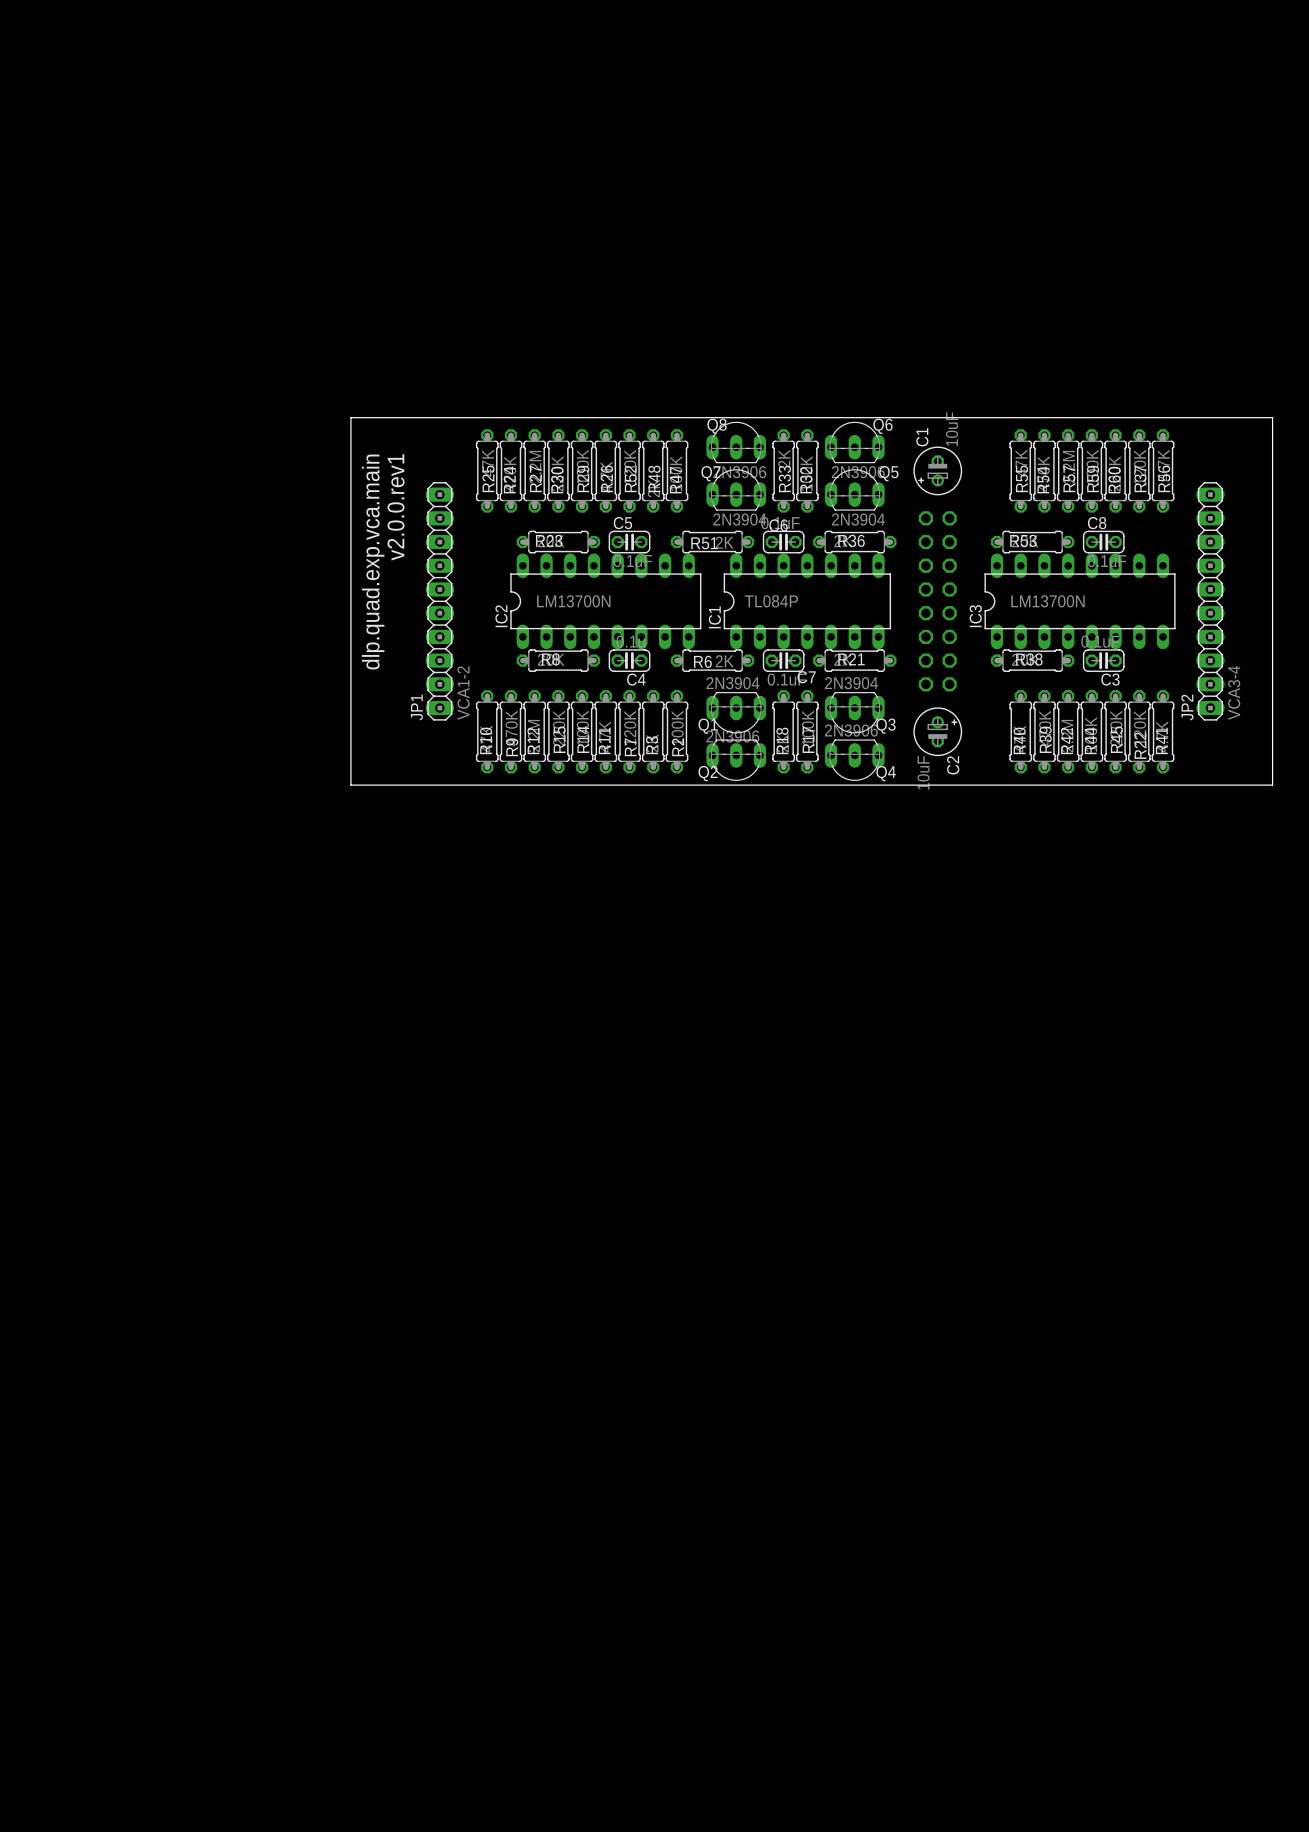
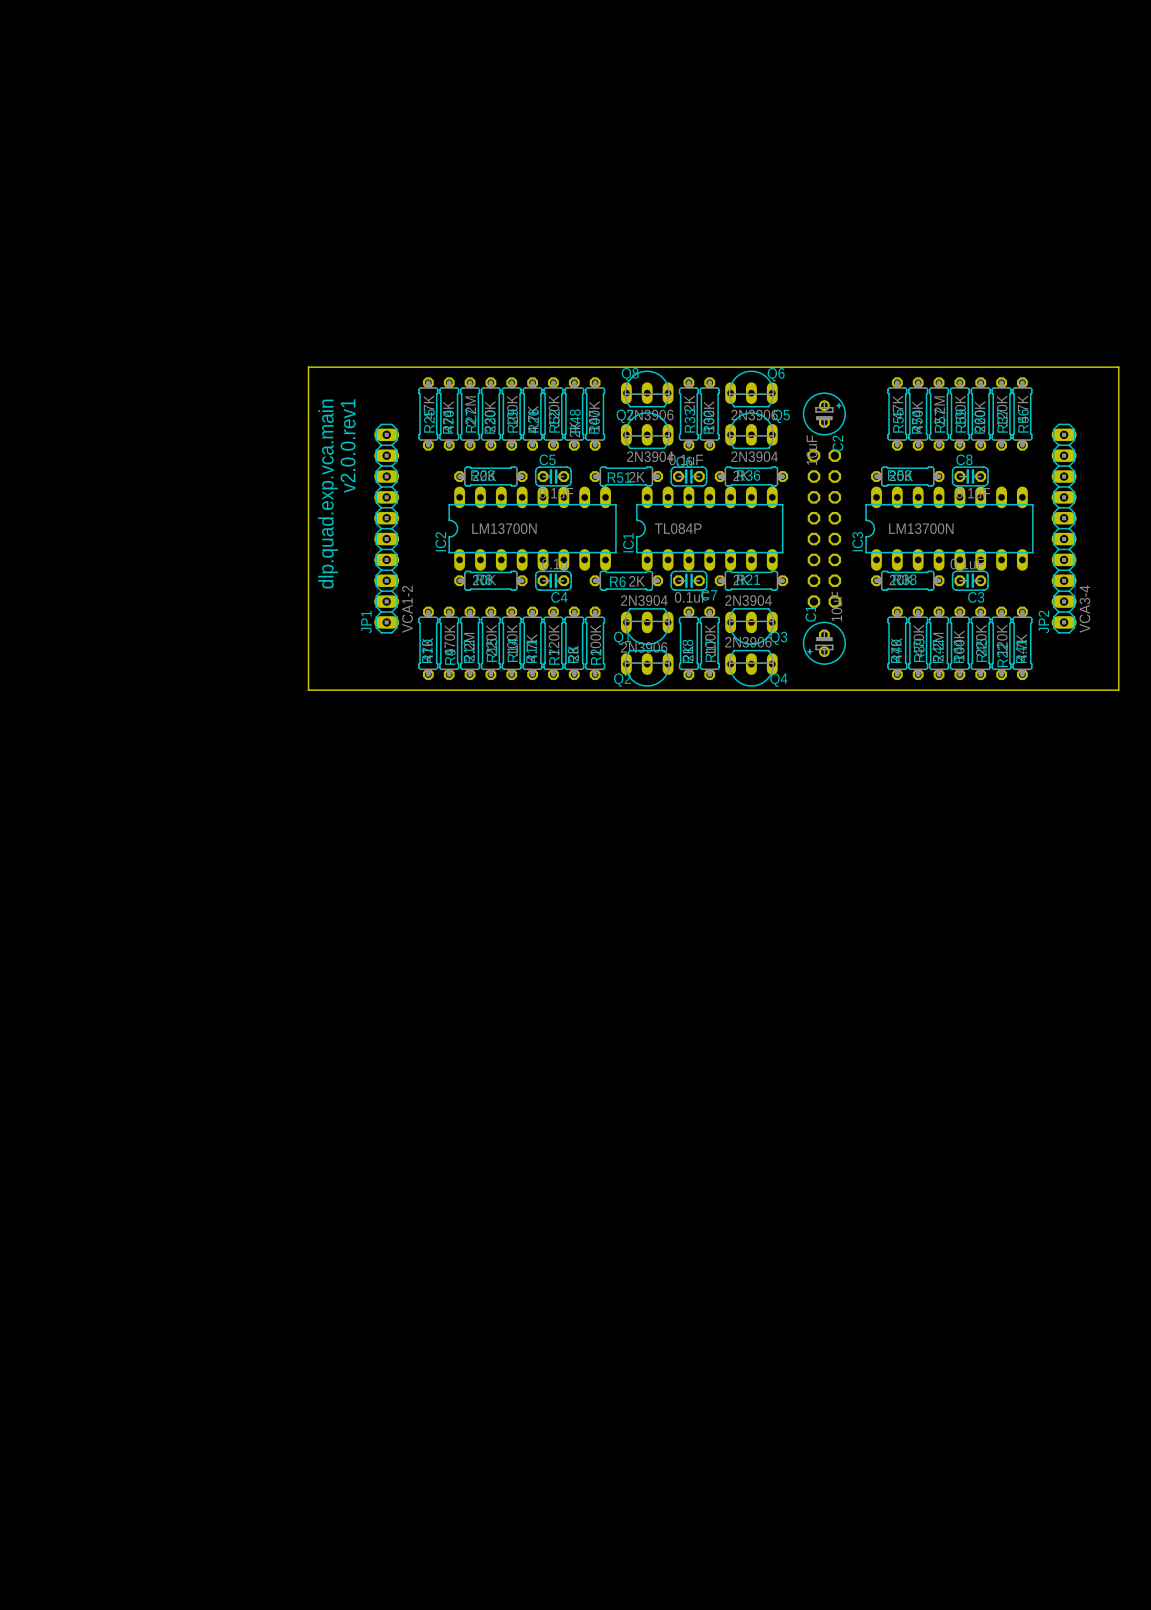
C1 position: (937, 470) -> (824, 643)
C2 position: (937, 731) -> (824, 413)

